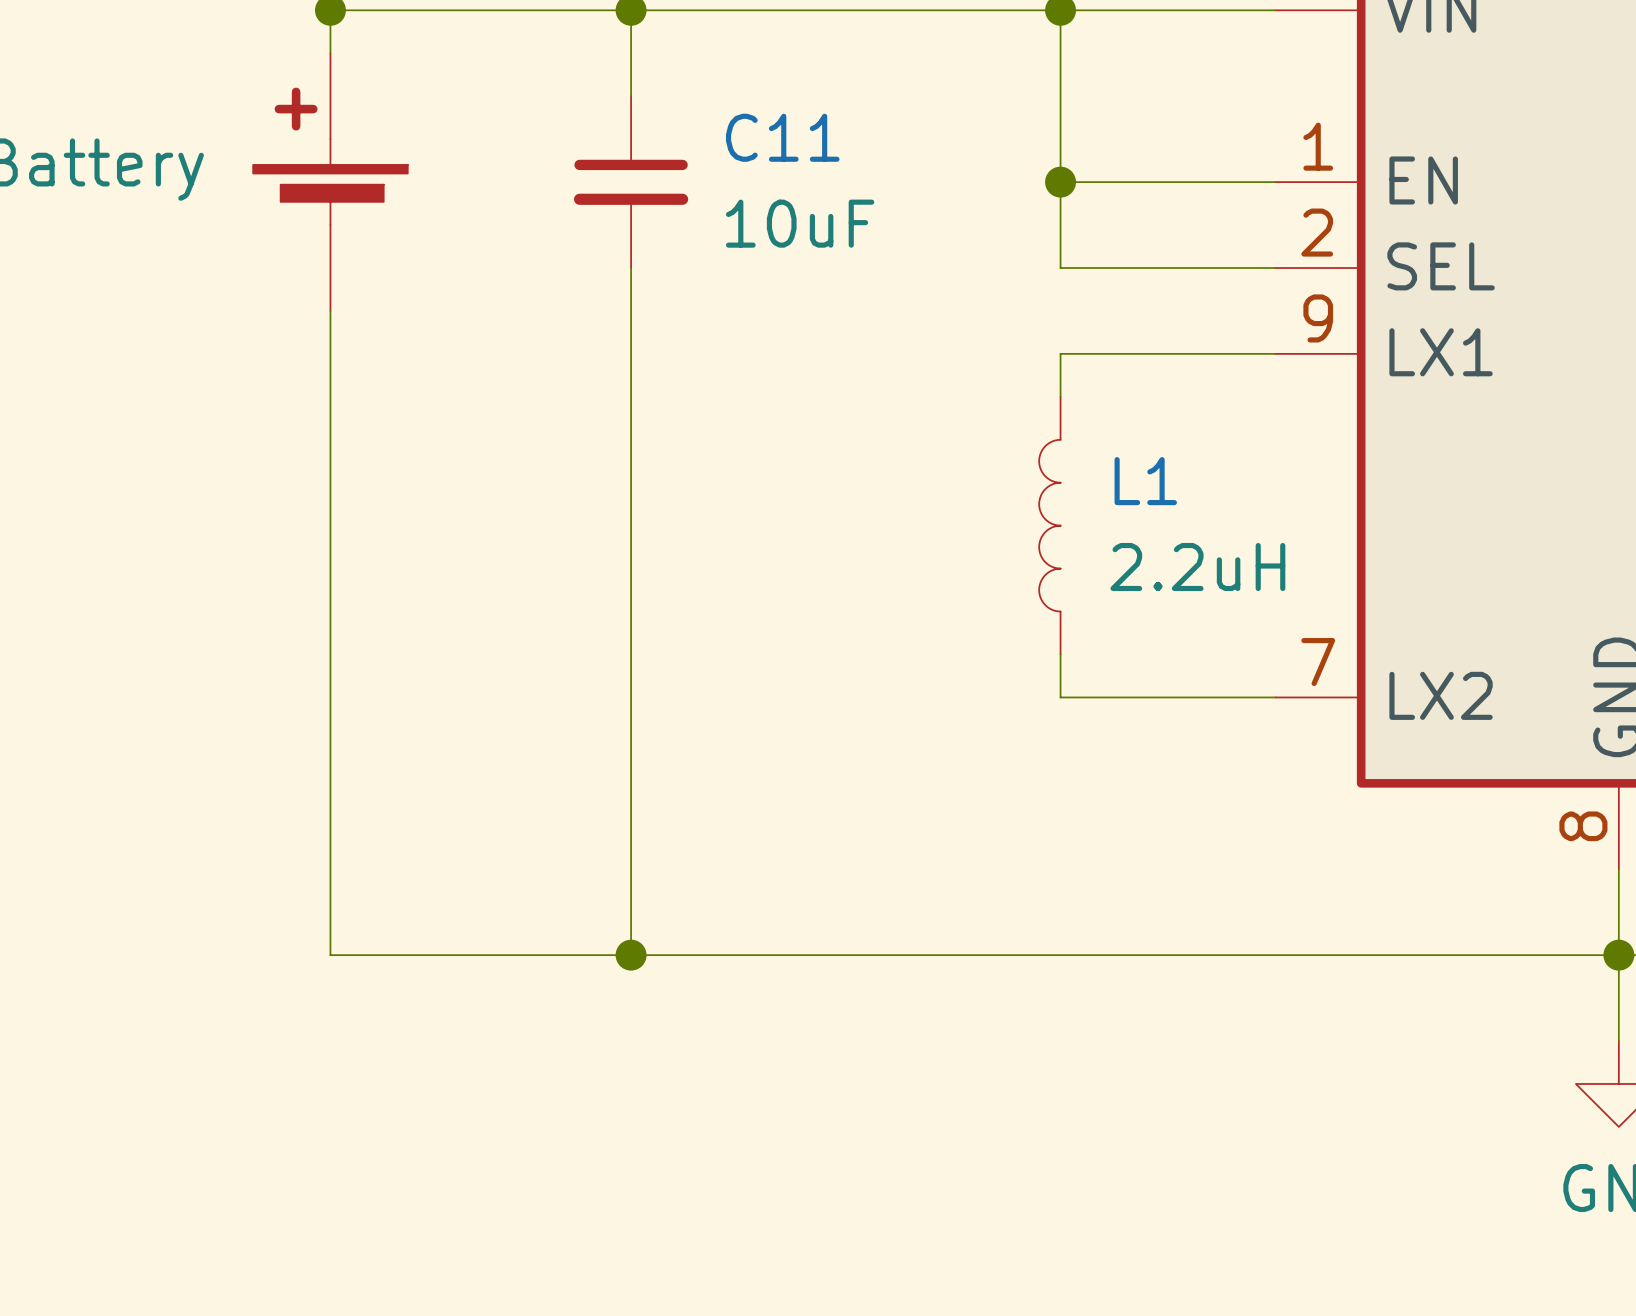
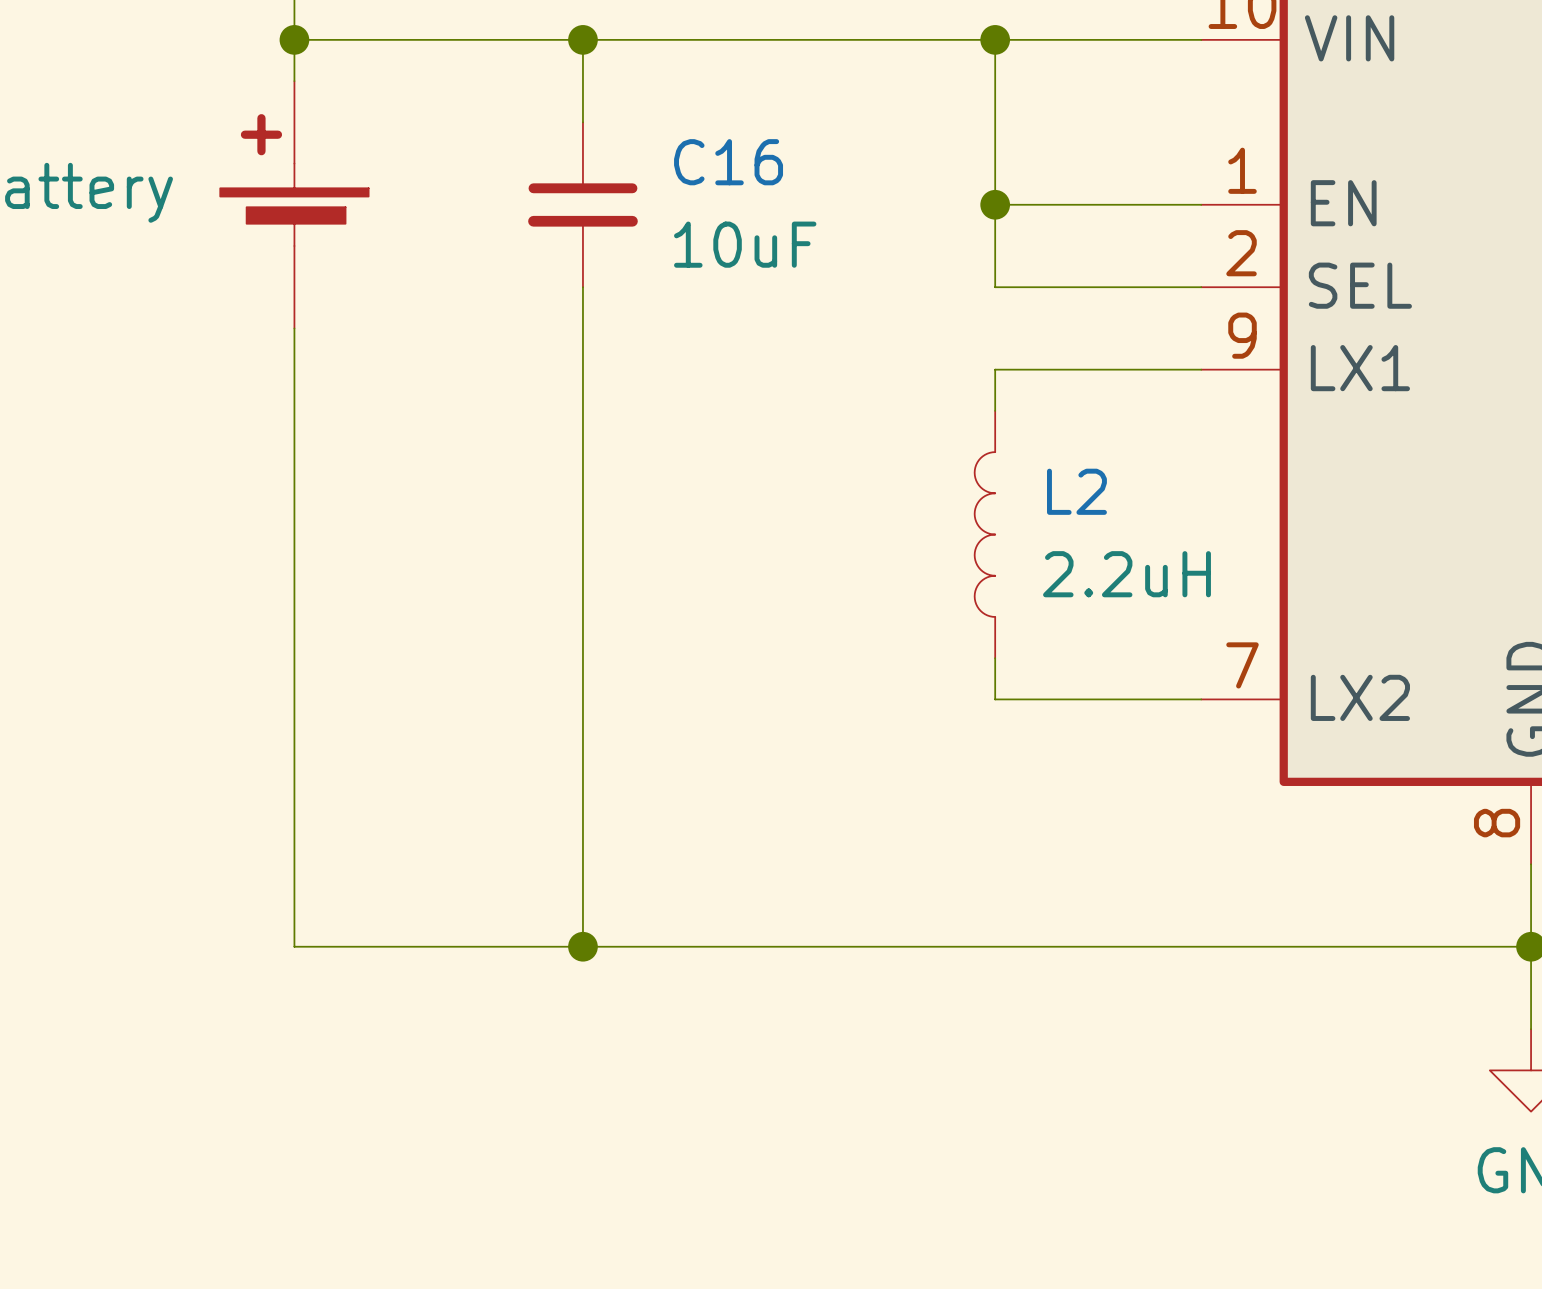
C11 name: C11 (782, 137) -> C16 (728, 162)
L1 name: L1 (1145, 481) -> L2 (1076, 491)

